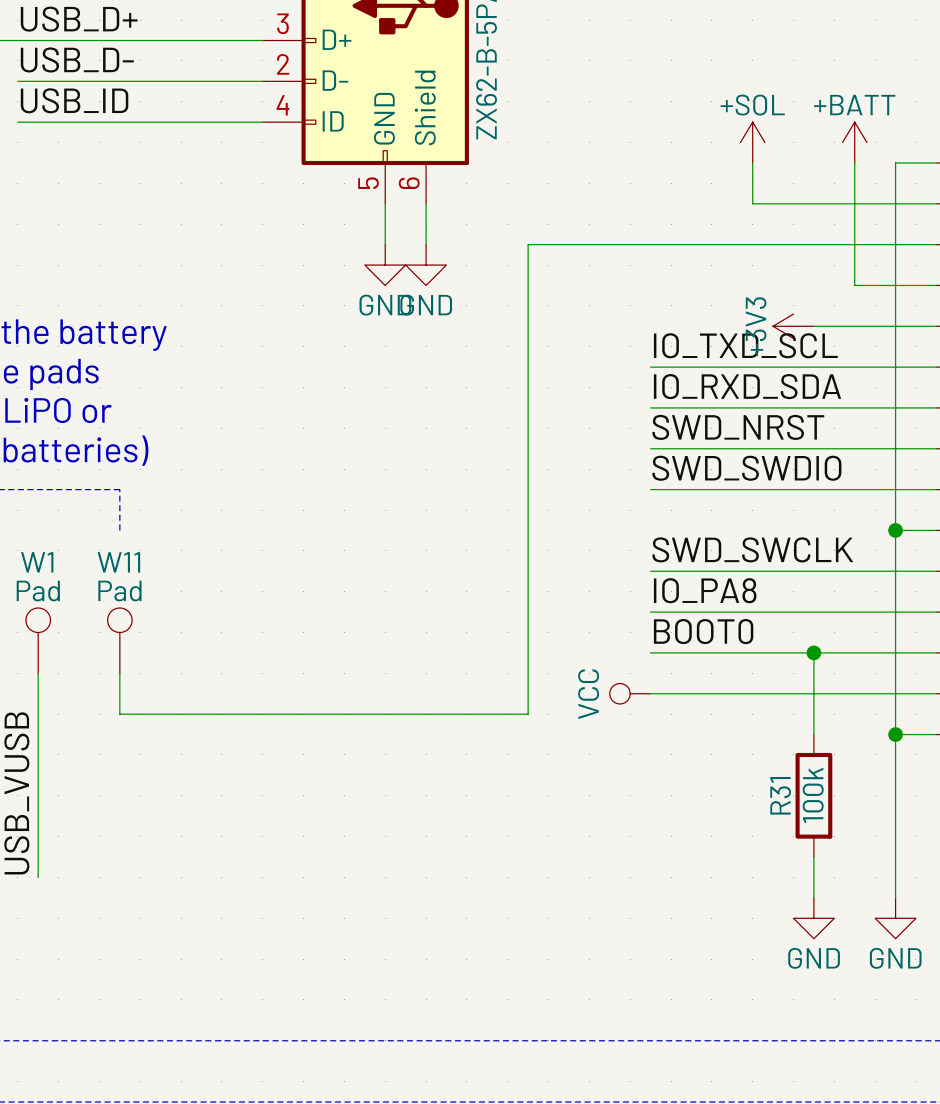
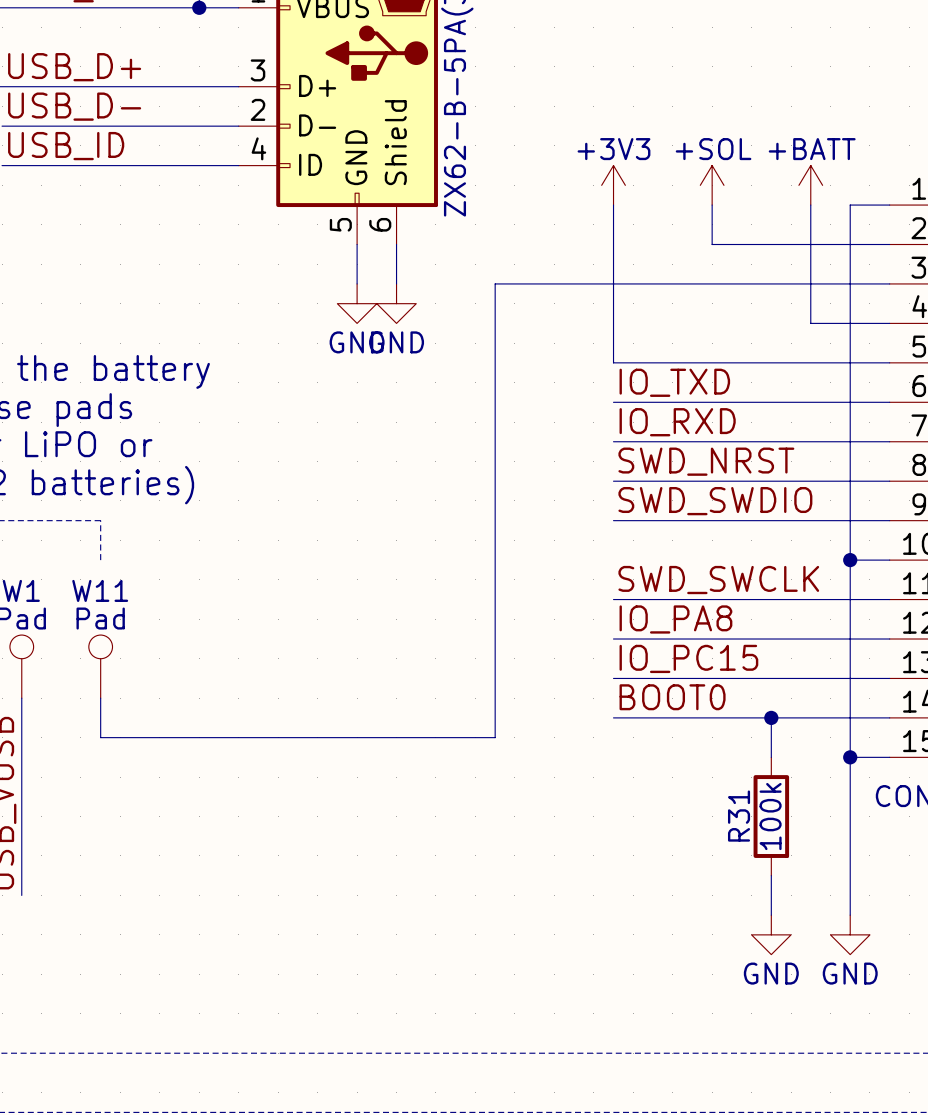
wire: none -> (613, 205) (613, 362) (771, 362)
power symbol rotation: 0° (793, 326) -> 90° clockwise (613, 185)
power symbol position: +3V3 (793, 326) -> +3V3 (613, 185)
label: IO_TXD_SCL (745, 345) -> IO_TXD (674, 382)
label: IO_RXD_SDA (747, 386) -> IO_RXD (677, 422)
label: BOOT0 (703, 631) -> IO_PC15 (688, 658)
wire: (813, 652) (813, 693) -> none
junction position: (813, 652) -> (771, 717)
label: none -> BOOT0 (672, 697)
power symbol: VCC (630, 693) -> none

